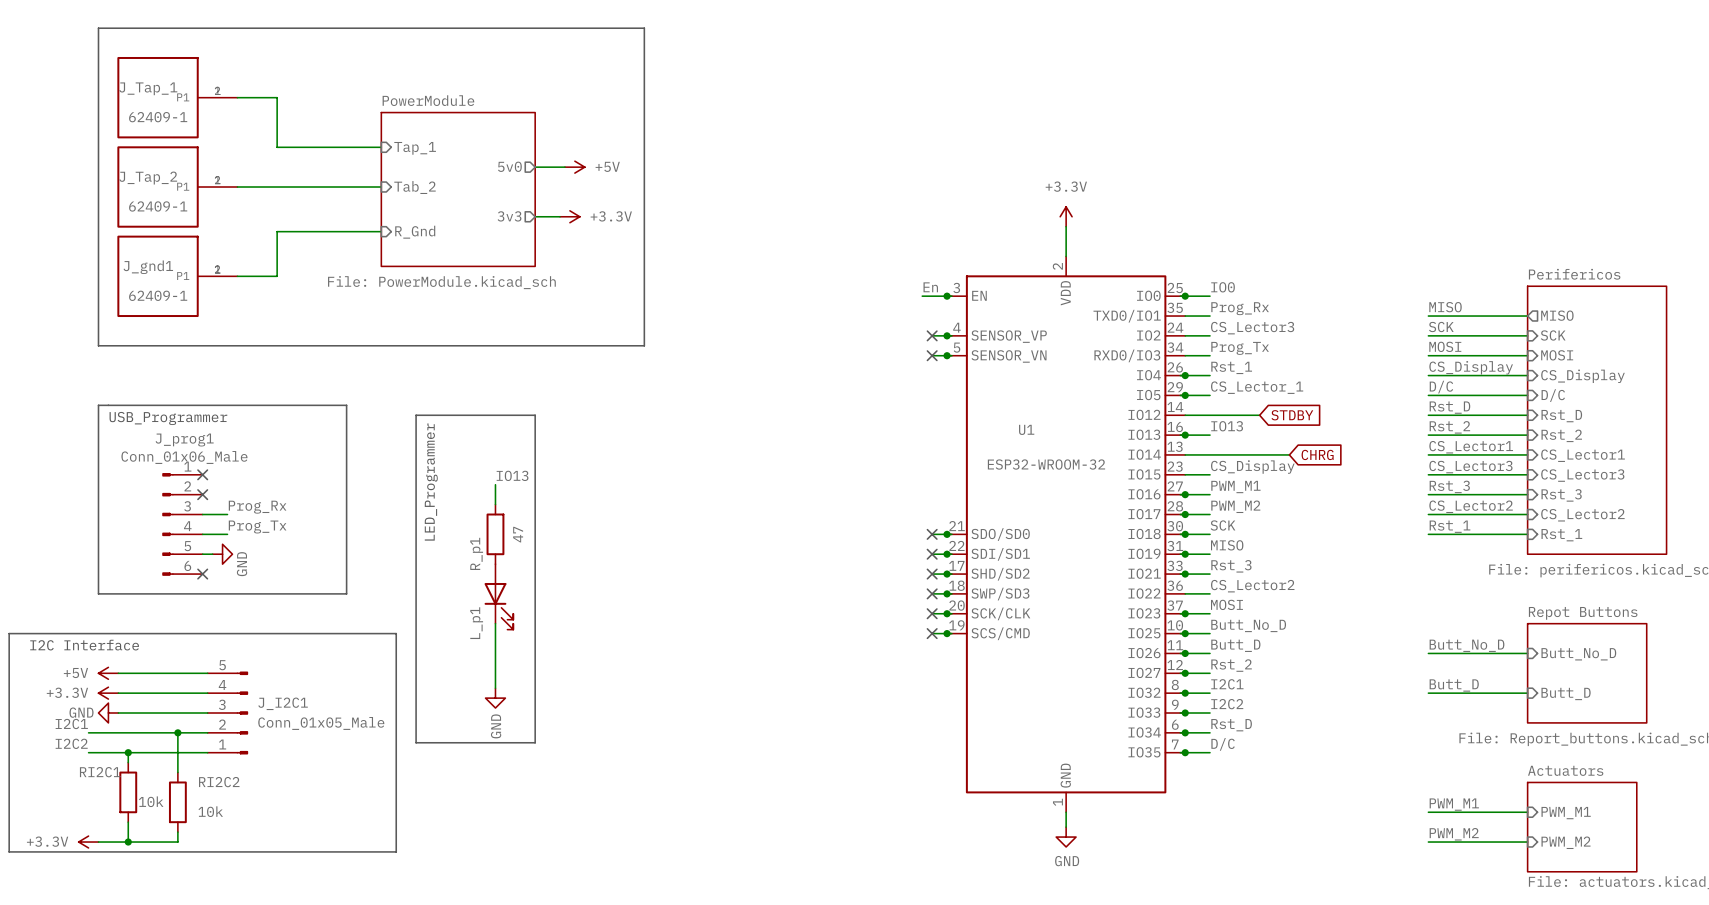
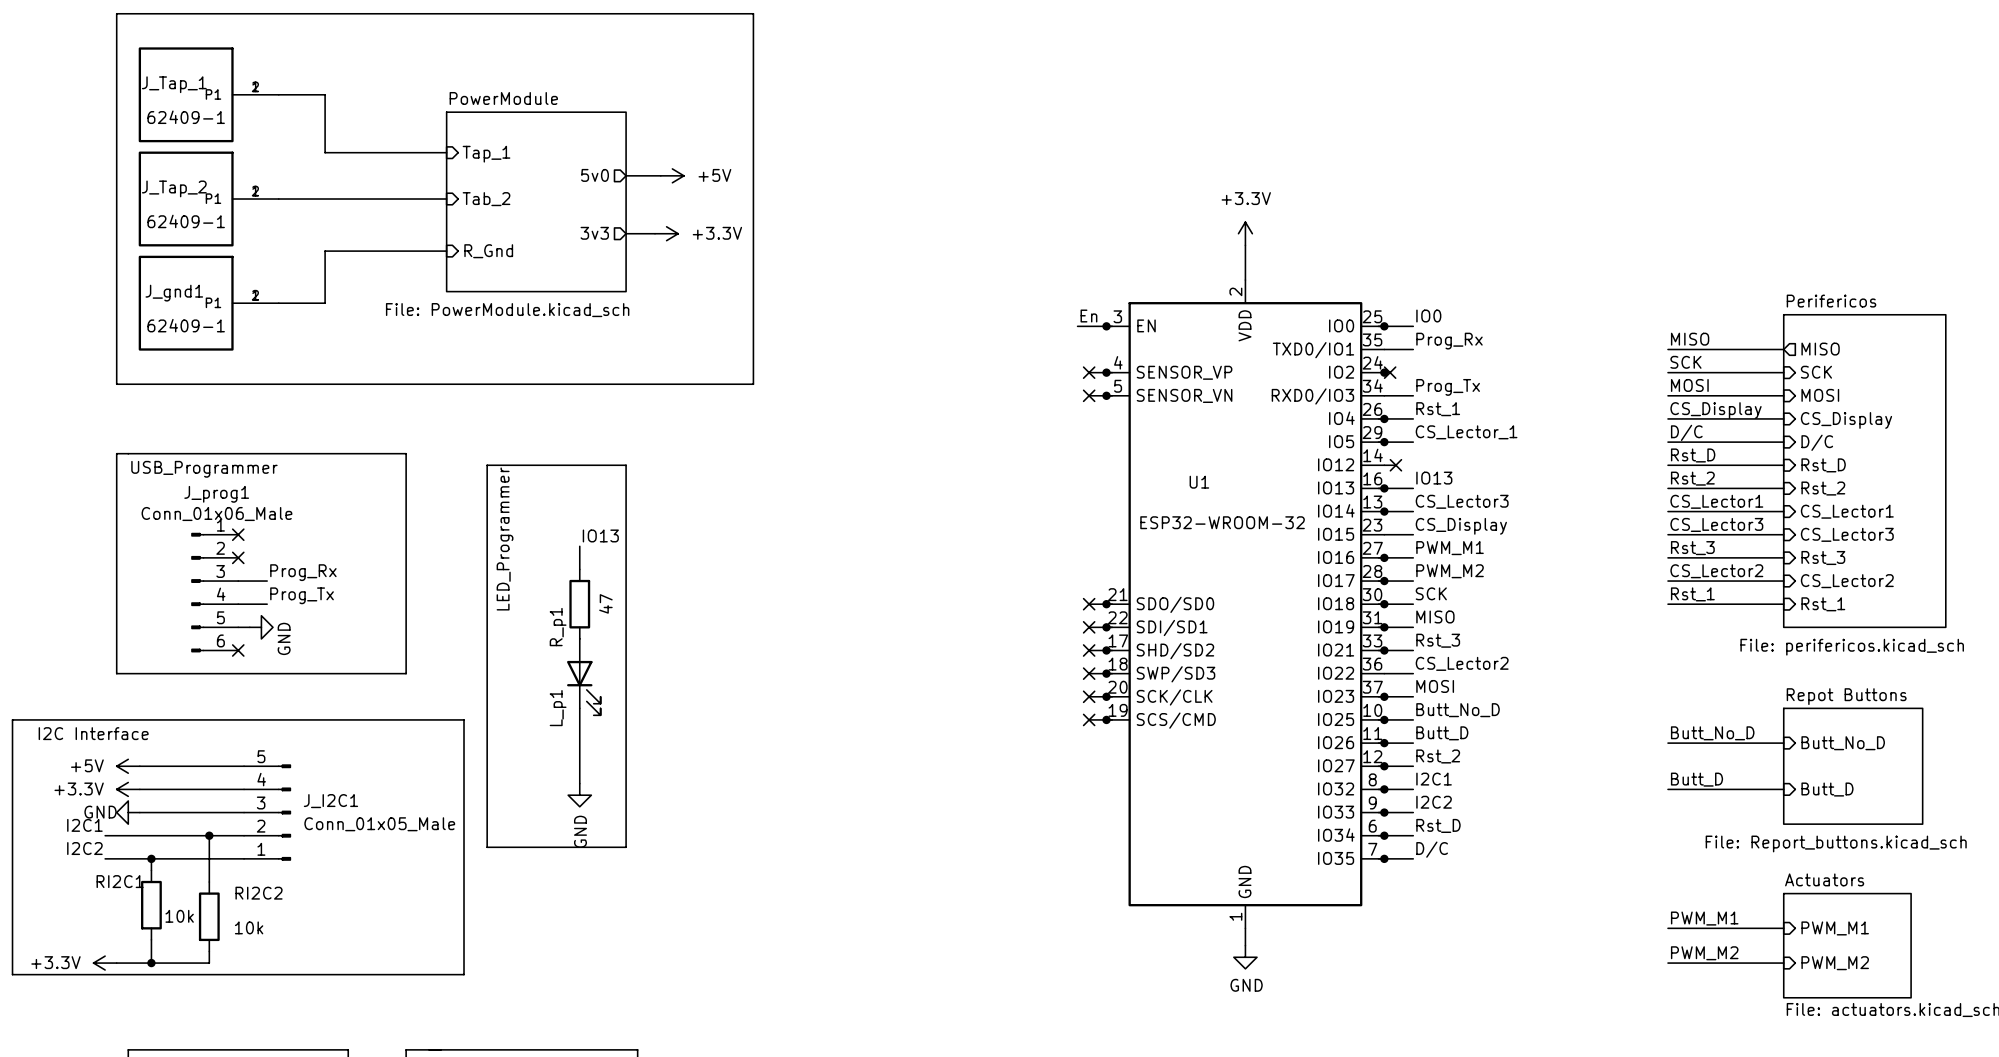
label position: CS_Lector3 (1252, 328) -> CS_Lector3 (1462, 501)
junction: none -> (1384, 372)
wire: (1190, 335) (1210, 335) -> none
no-connect mark: none -> (1390, 372)
wire: (1195, 415) (1259, 415) -> none
no-connect mark: none -> (1395, 465)
global label: STDBY (1292, 415) -> none
junction: none -> (1384, 511)
wire: (1210, 454) (1289, 454) -> none
global label: CHRG (1317, 454) -> none

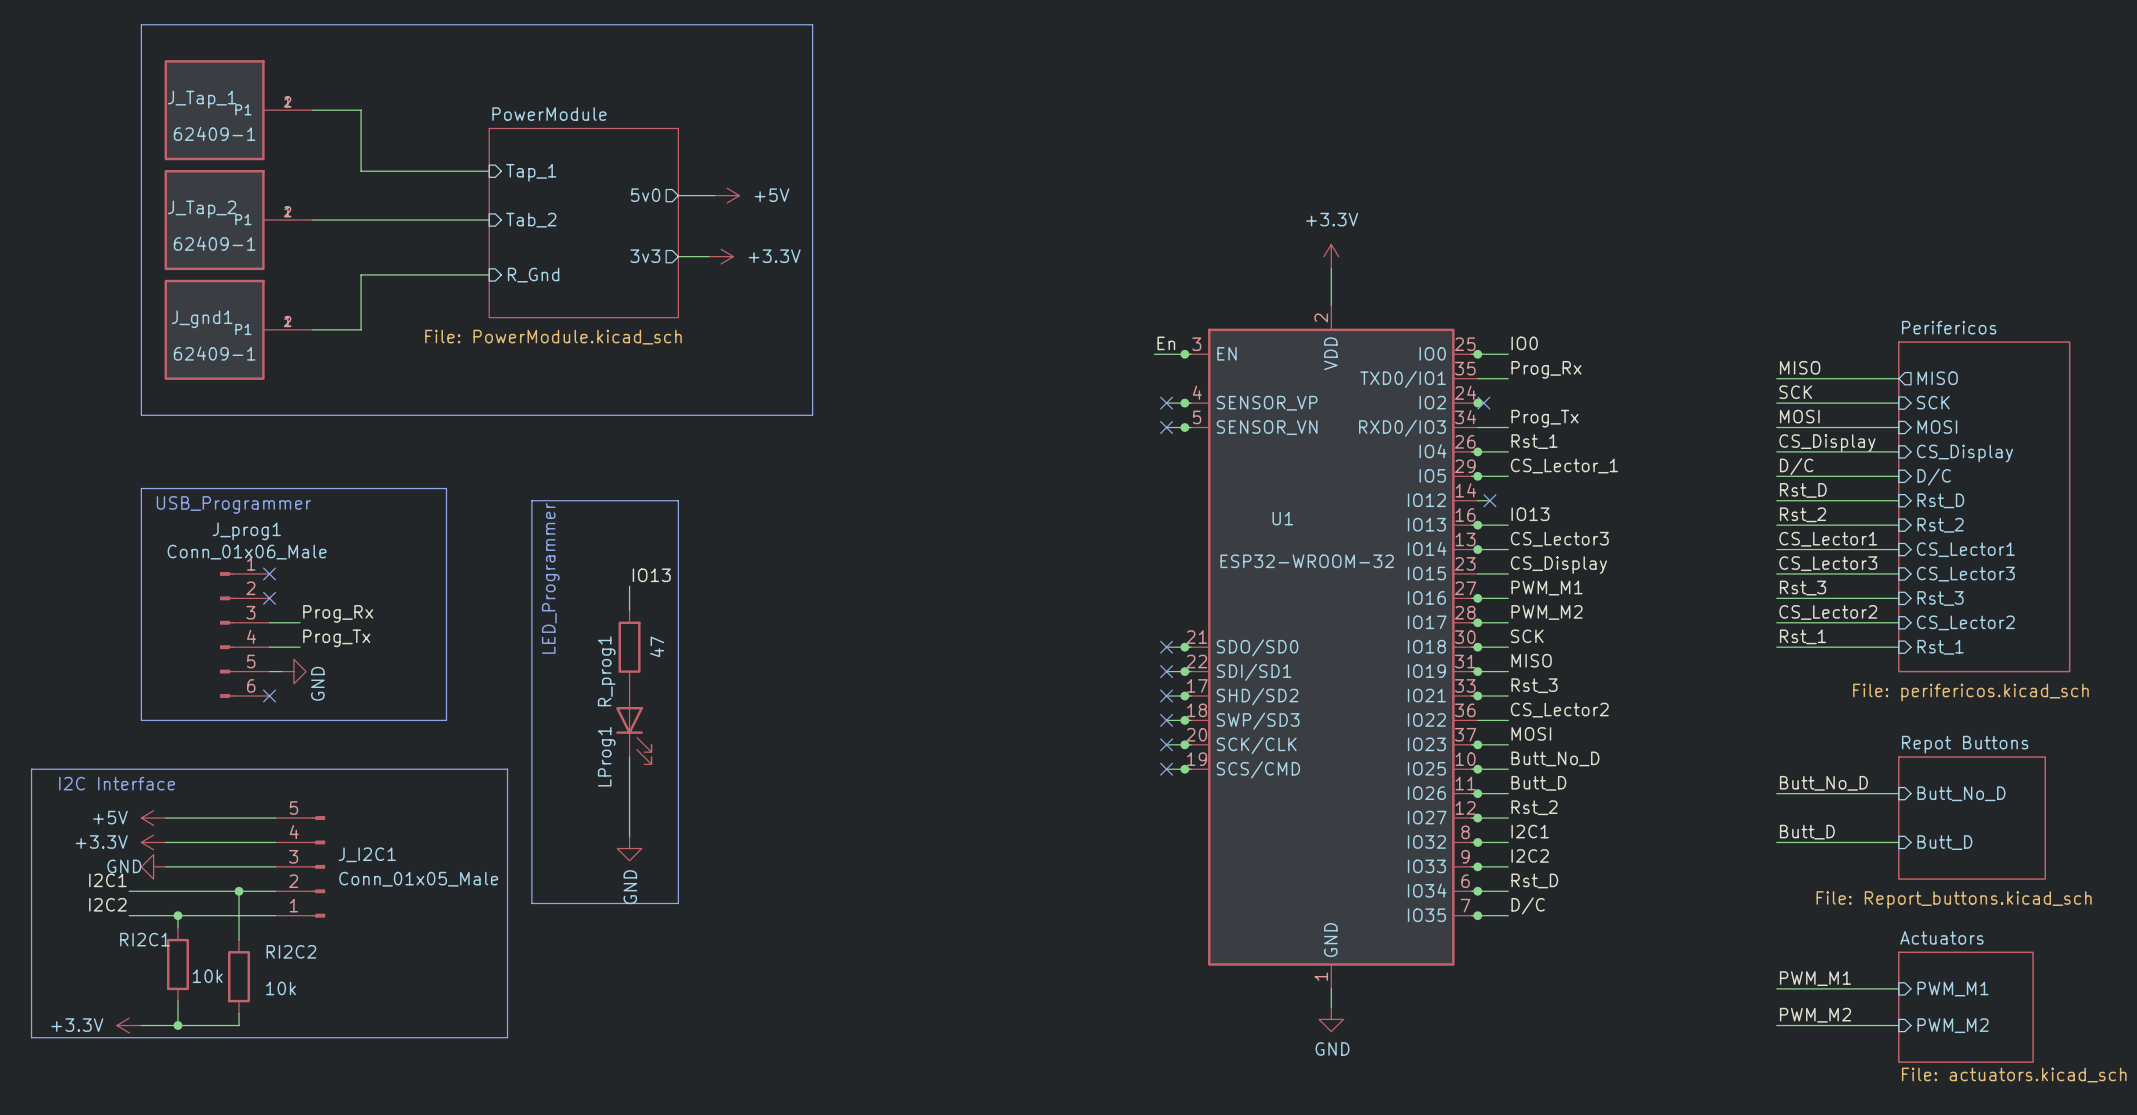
R_p1 name: R_p1 (558, 627) -> R_prog1 (606, 671)
L_p1 name: L_p1 (558, 708) -> LProg1 (606, 756)

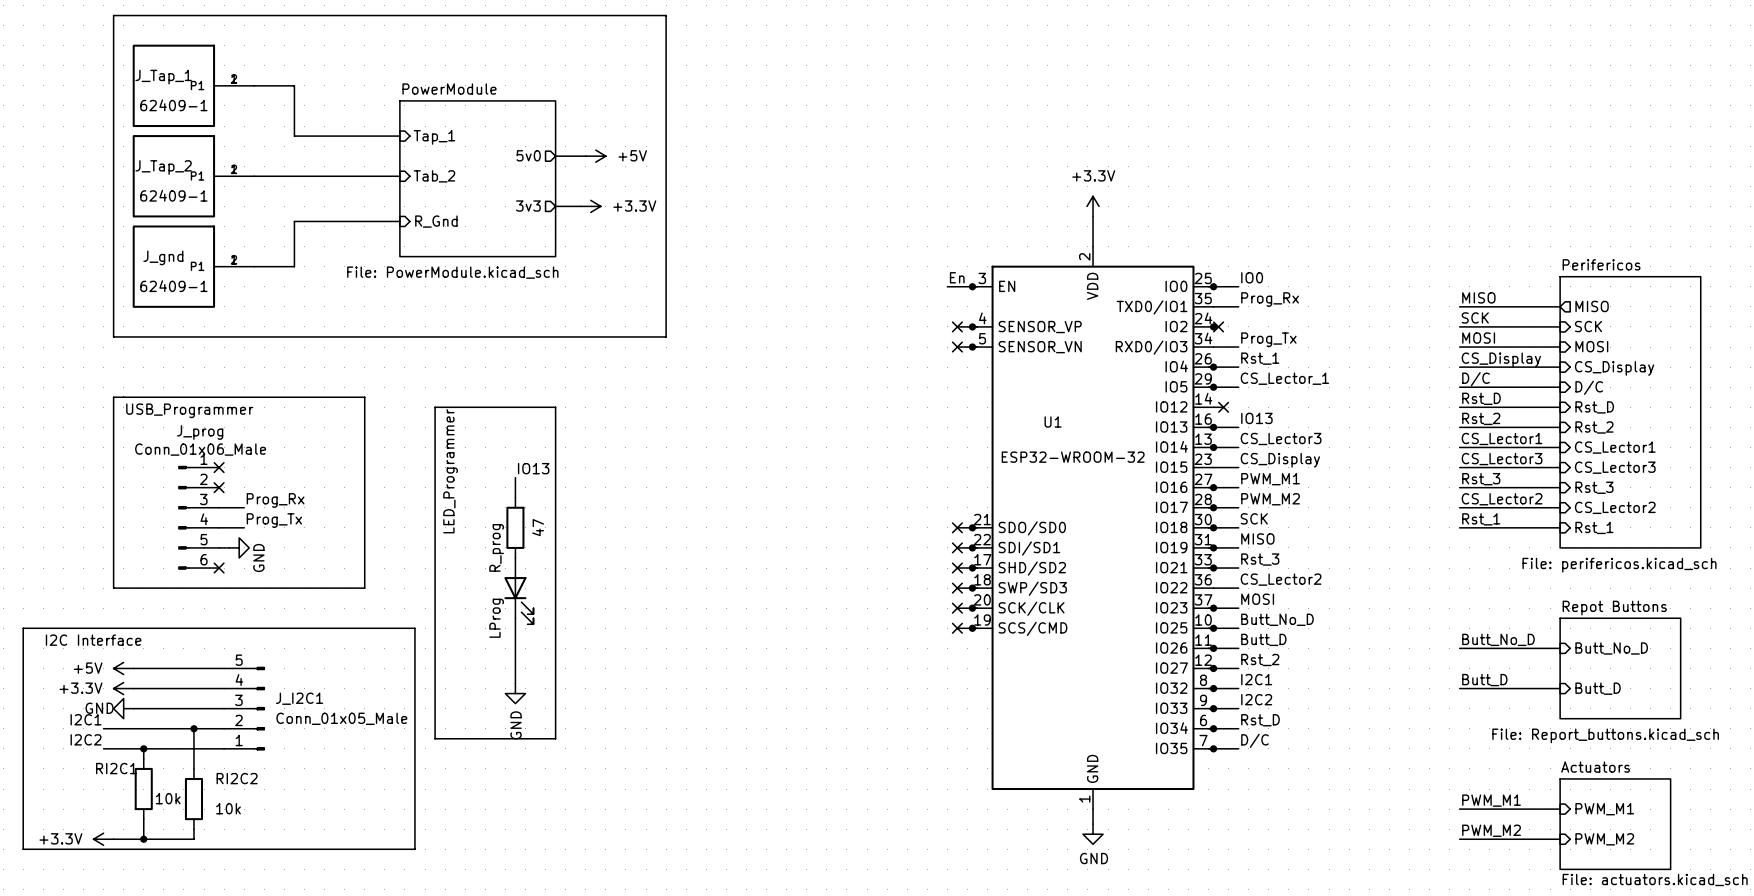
J_gnd1 name: J_gnd1 (202, 319) -> J_gnd (163, 257)
J_prog1 name: J_prog1 (246, 531) -> J_prog (200, 432)
R_prog1 name: R_prog1 (606, 671) -> R_prog (496, 547)
LProg1 name: LProg1 (606, 756) -> LProg (496, 618)

